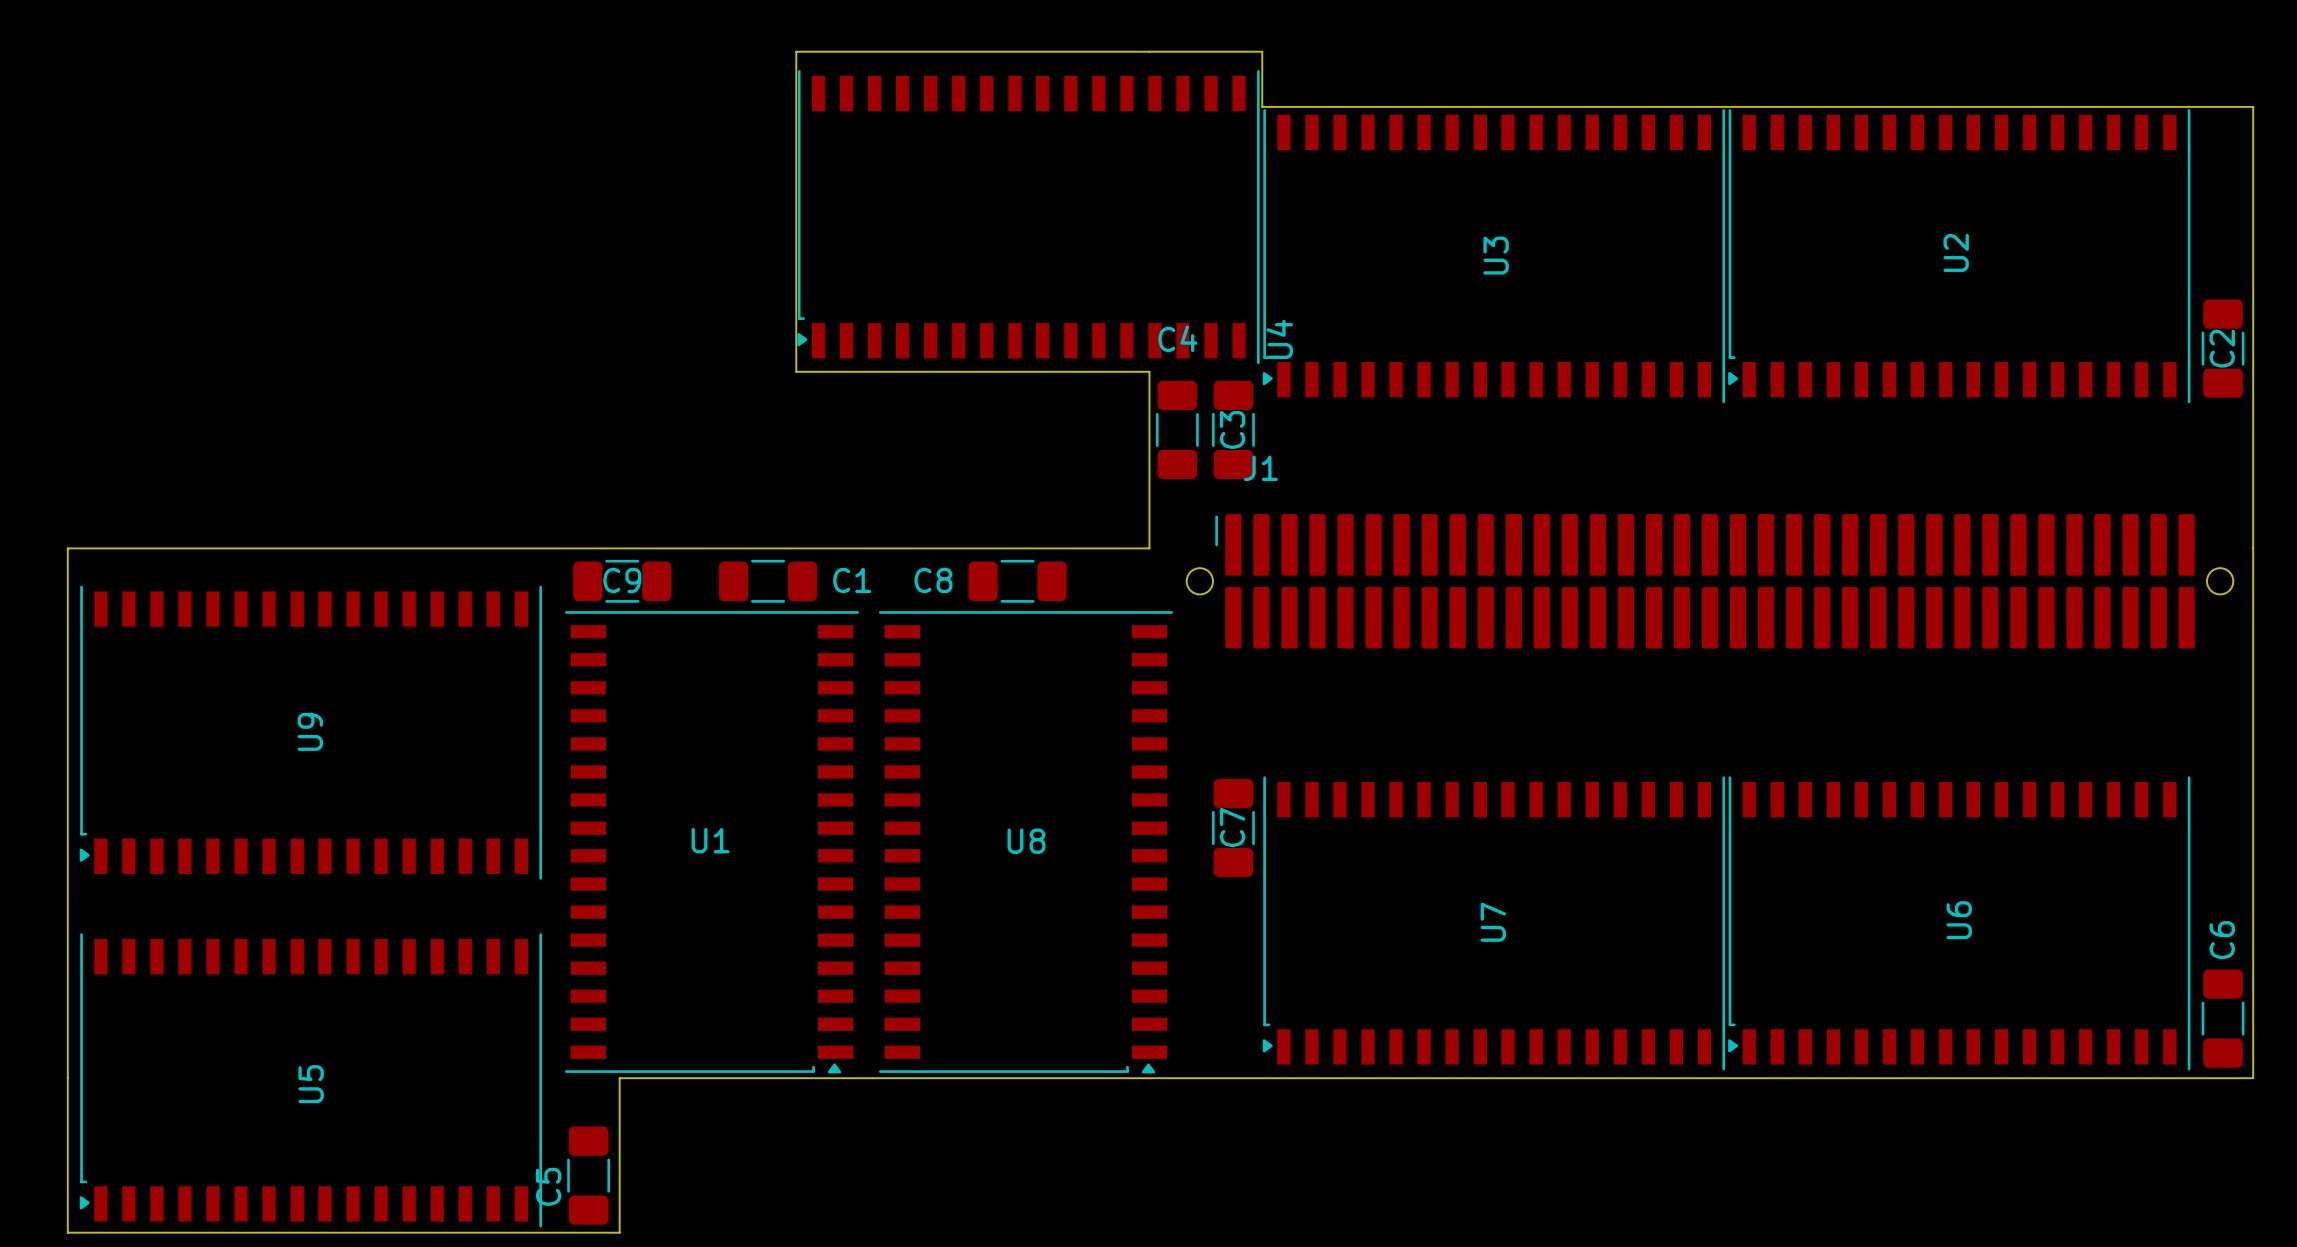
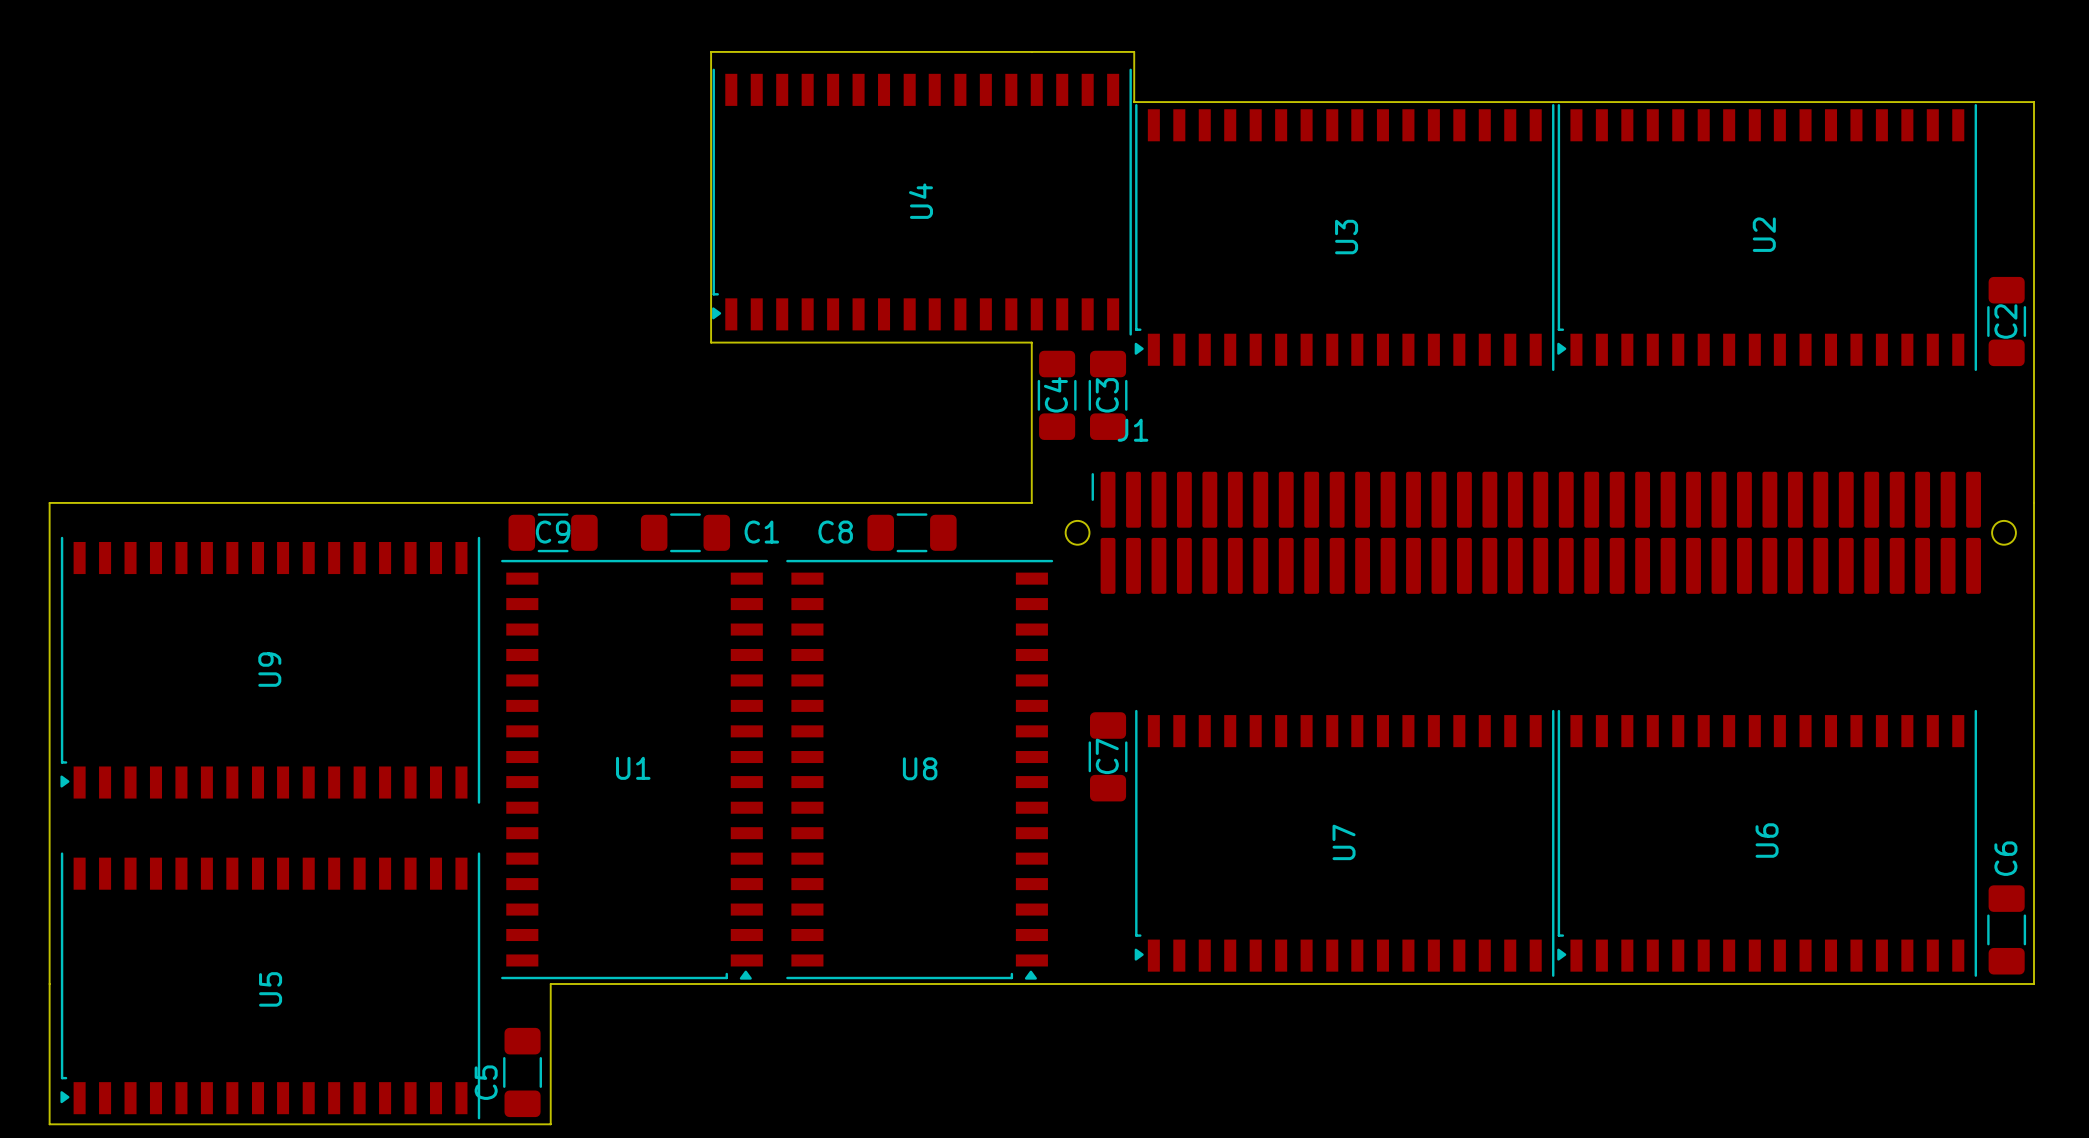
C4 name rotation: 0° (1177, 338) -> 90° counterclockwise (1055, 394)
C4 name position: C4 (1177, 338) -> C4 (1055, 394)
U4 name position: U4 (1279, 339) -> U4 (920, 201)

